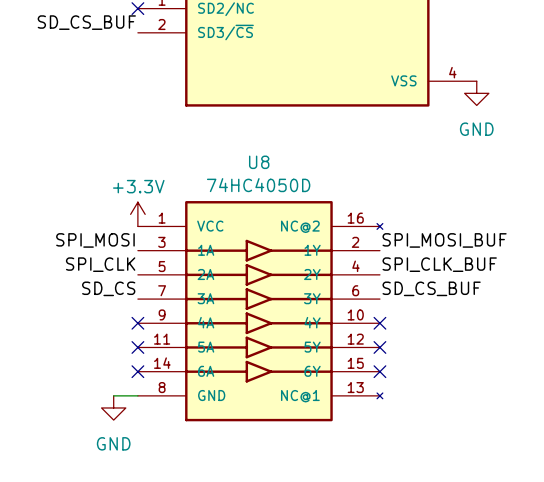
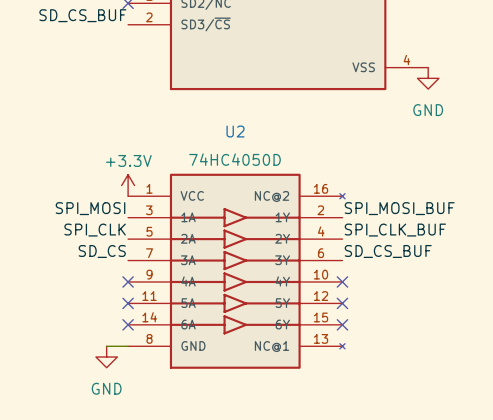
U8 name: U8 (259, 162) -> U2 (235, 131)

